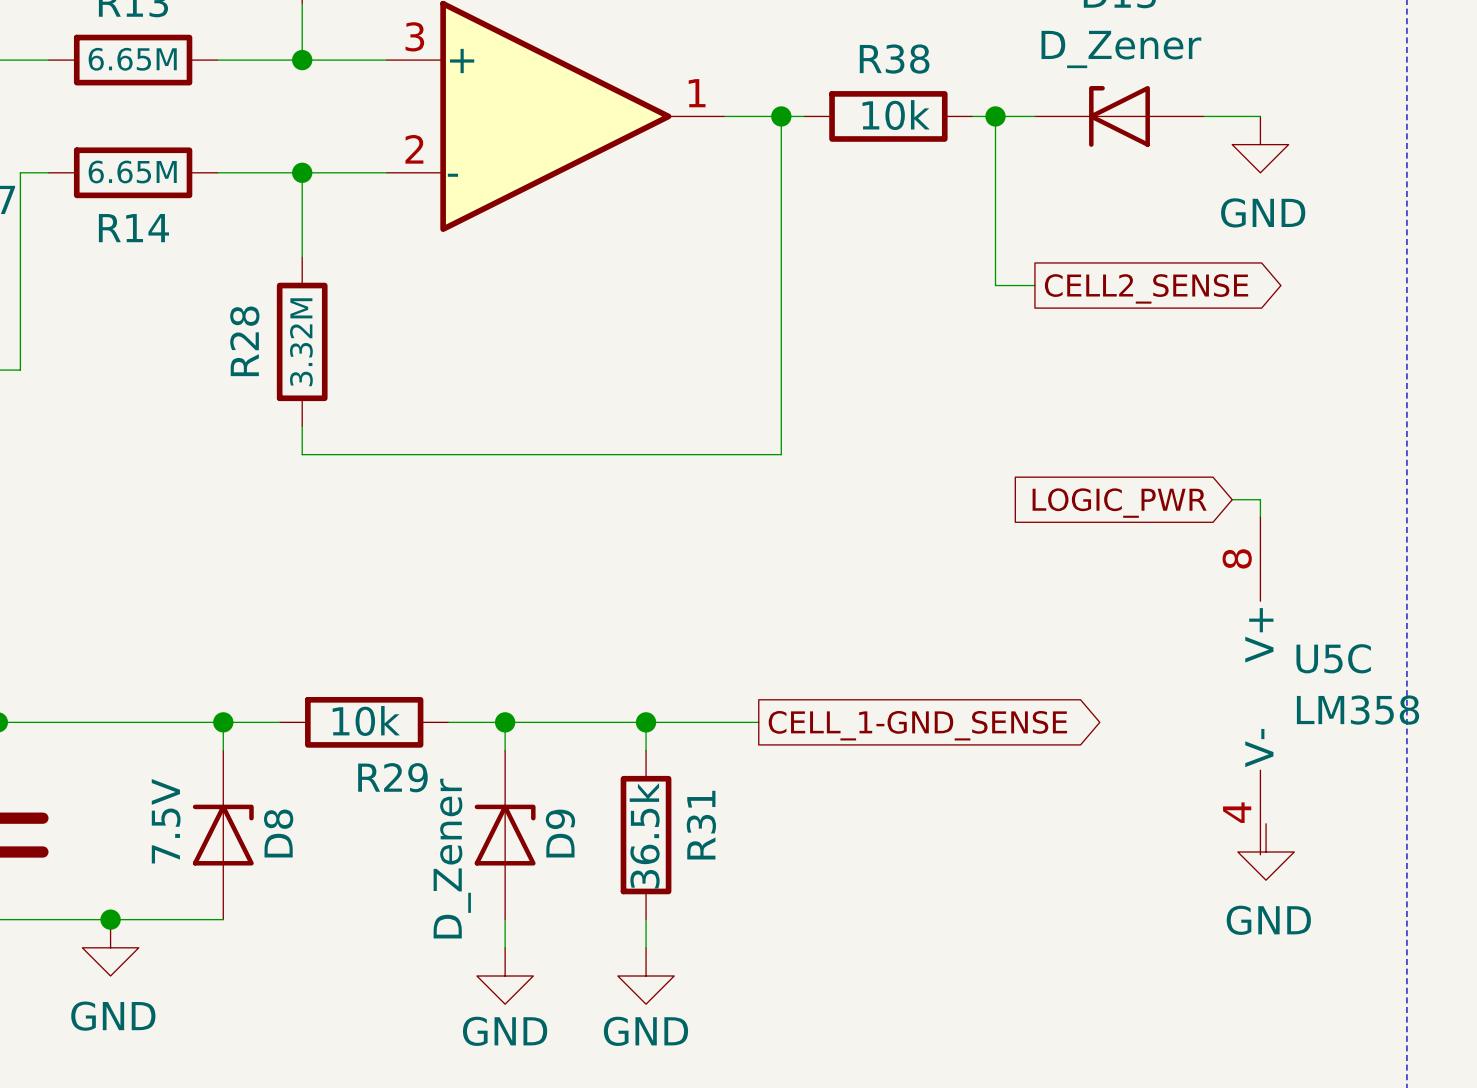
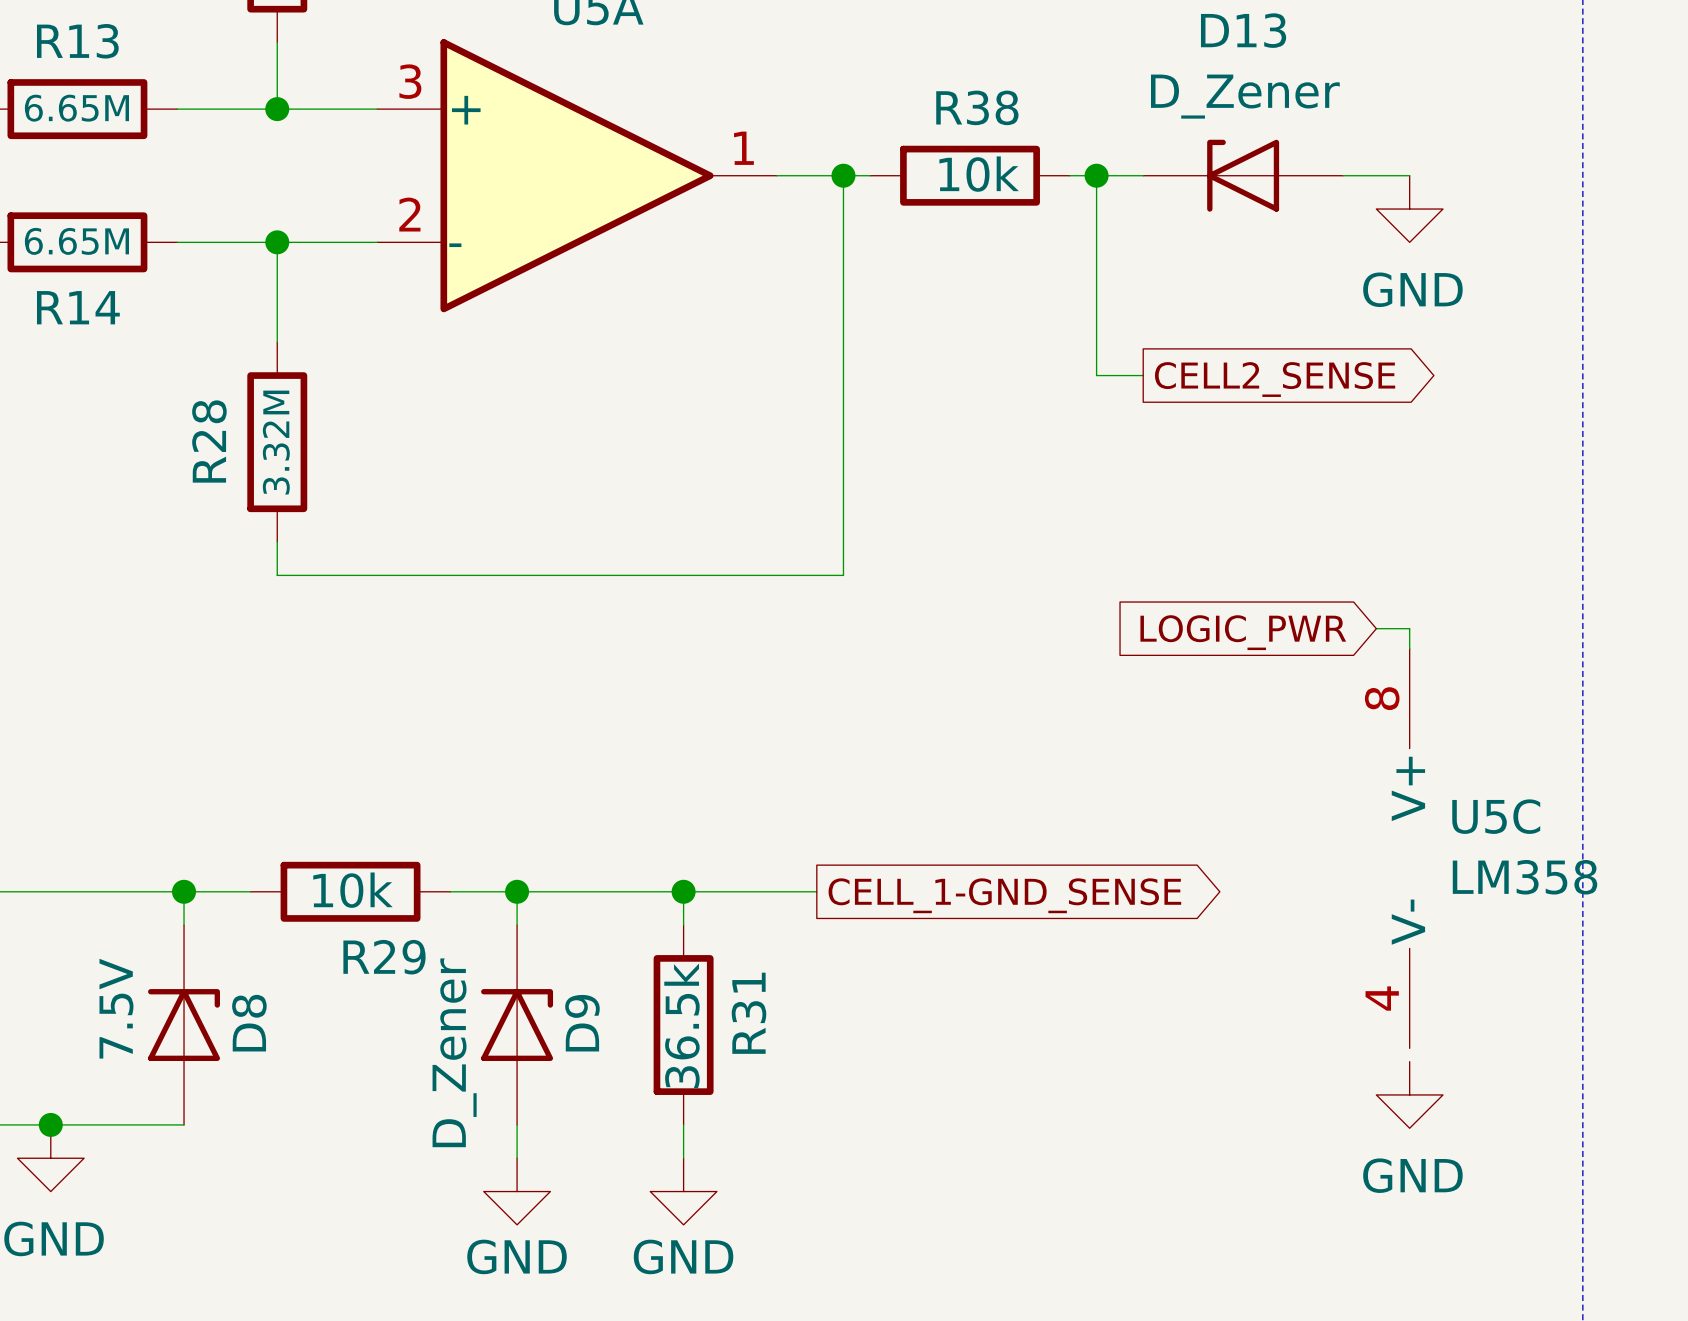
power symbol position: GND (1266, 852) -> GND (1409, 1094)

